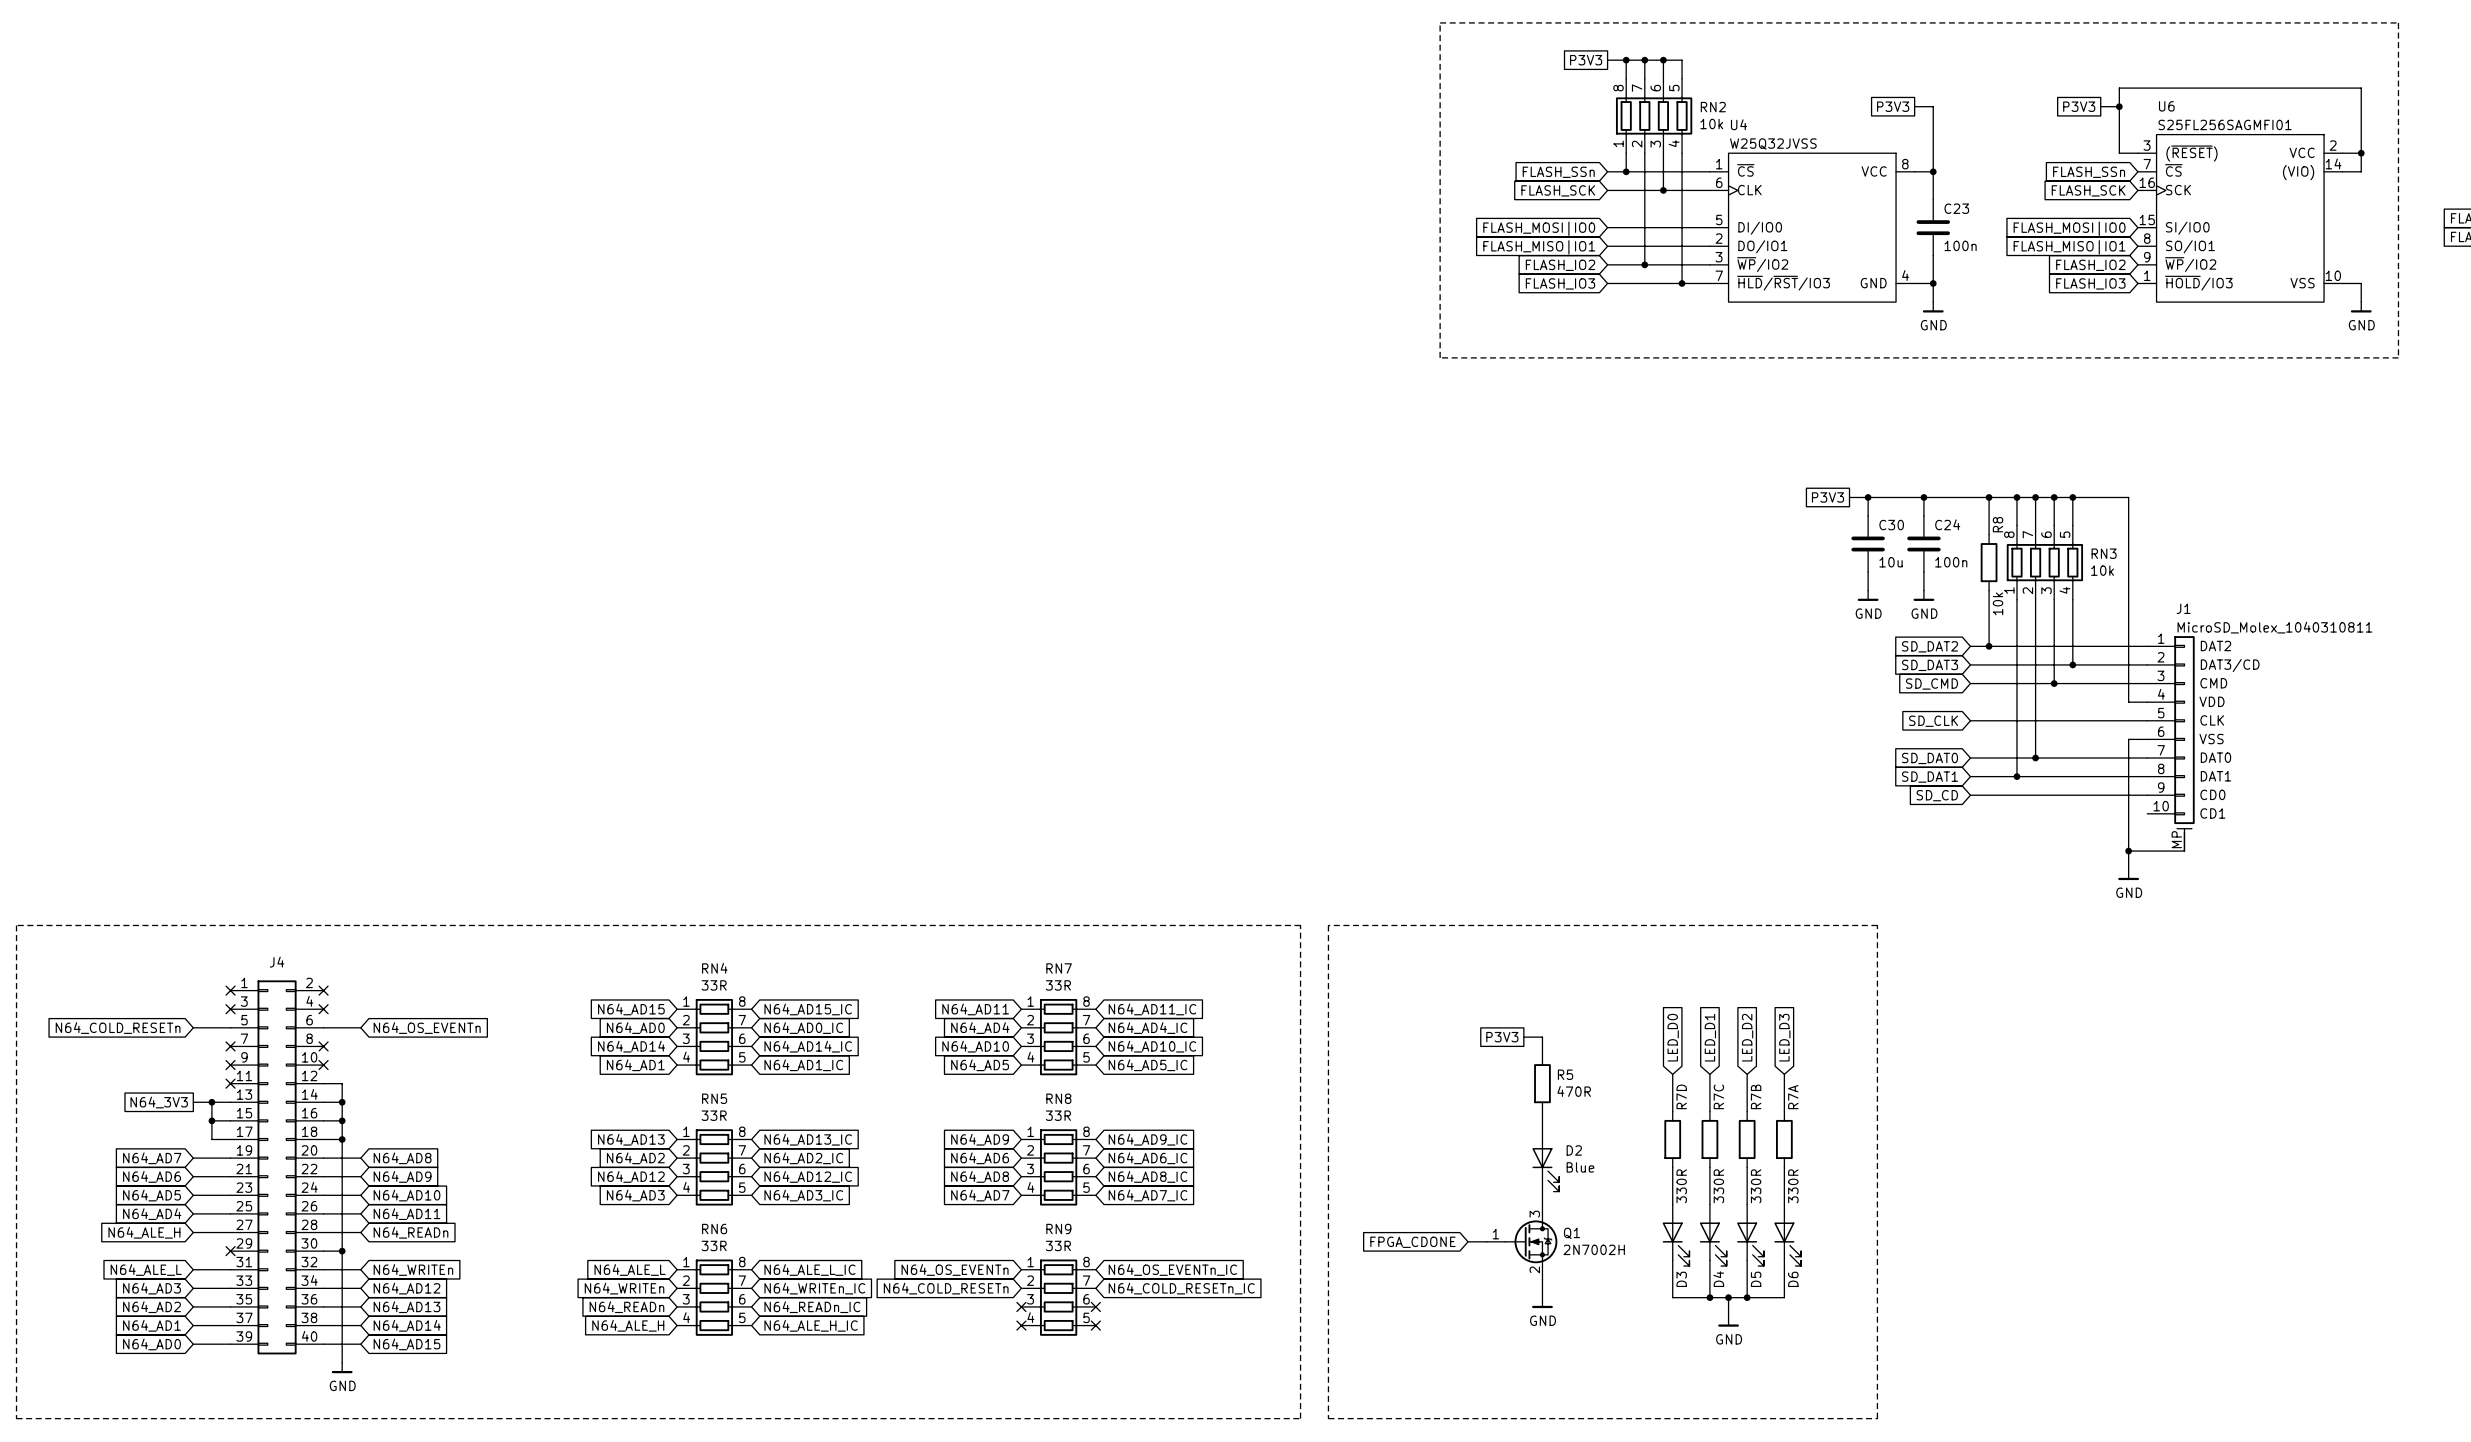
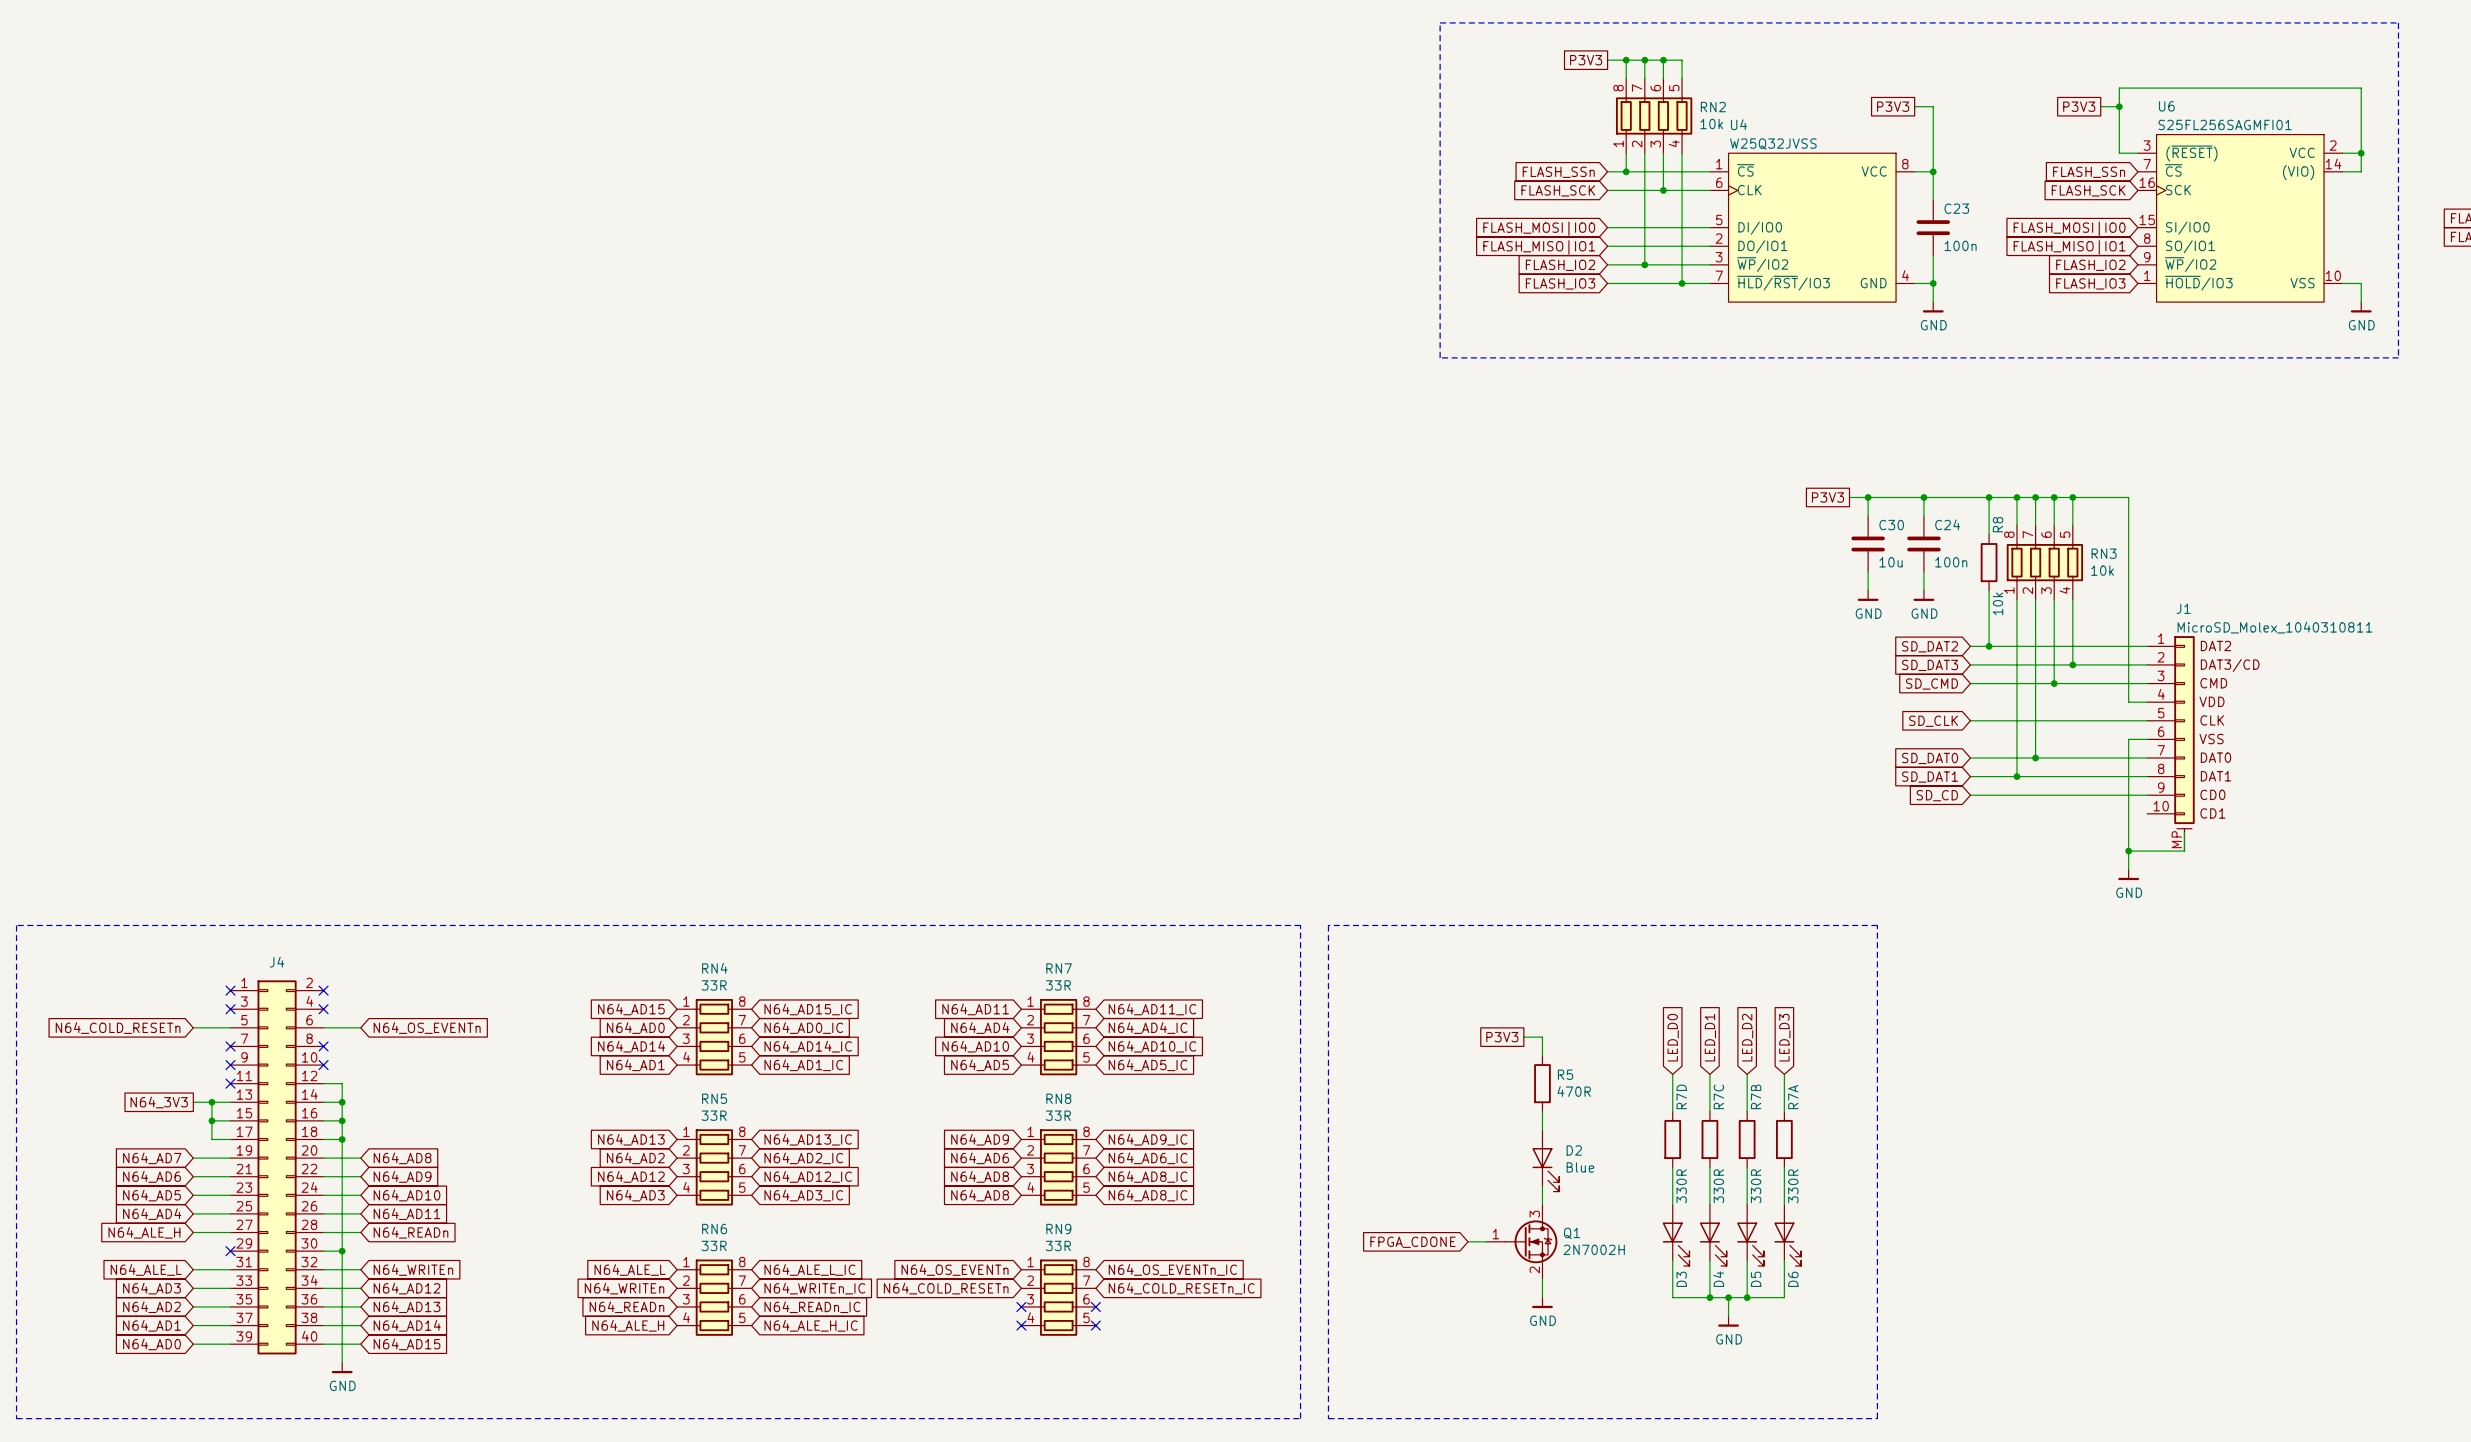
global label: N64_AD7 (980, 1195) -> N64_AD8 (980, 1195)
global label: N64_AD7_IC (1148, 1195) -> N64_AD8_IC (1148, 1195)

